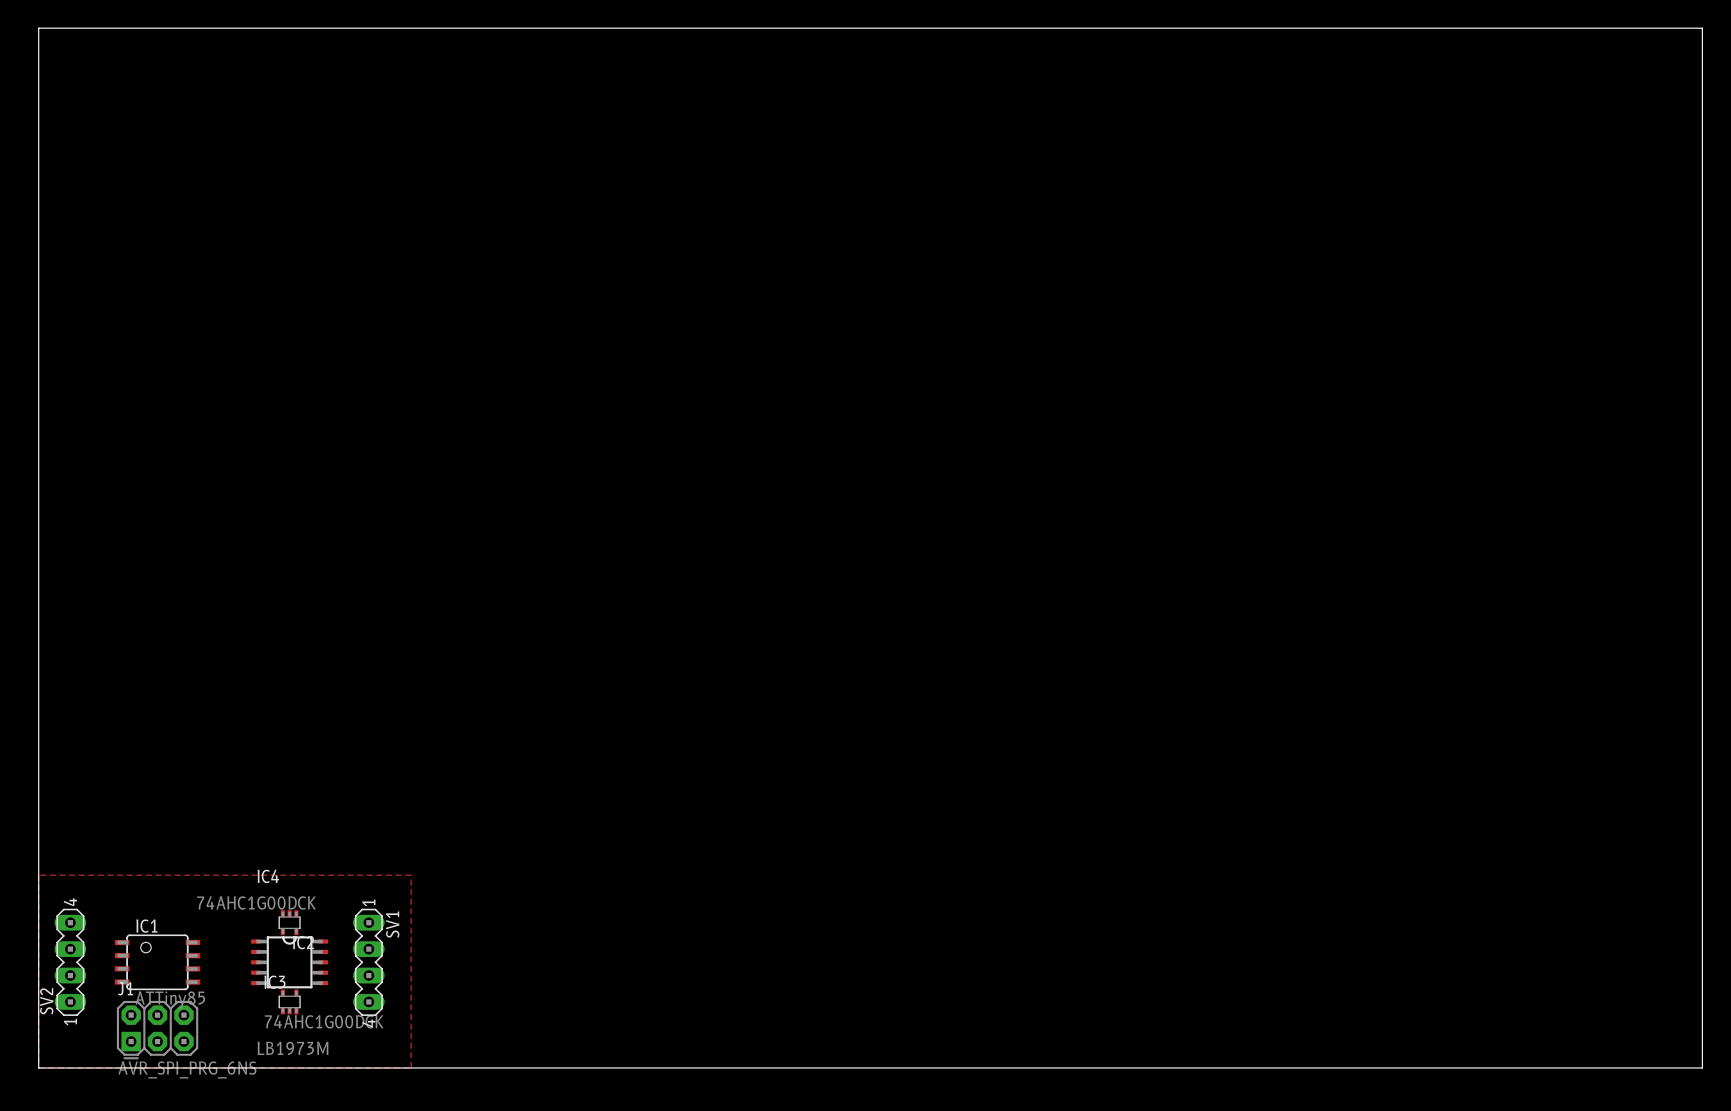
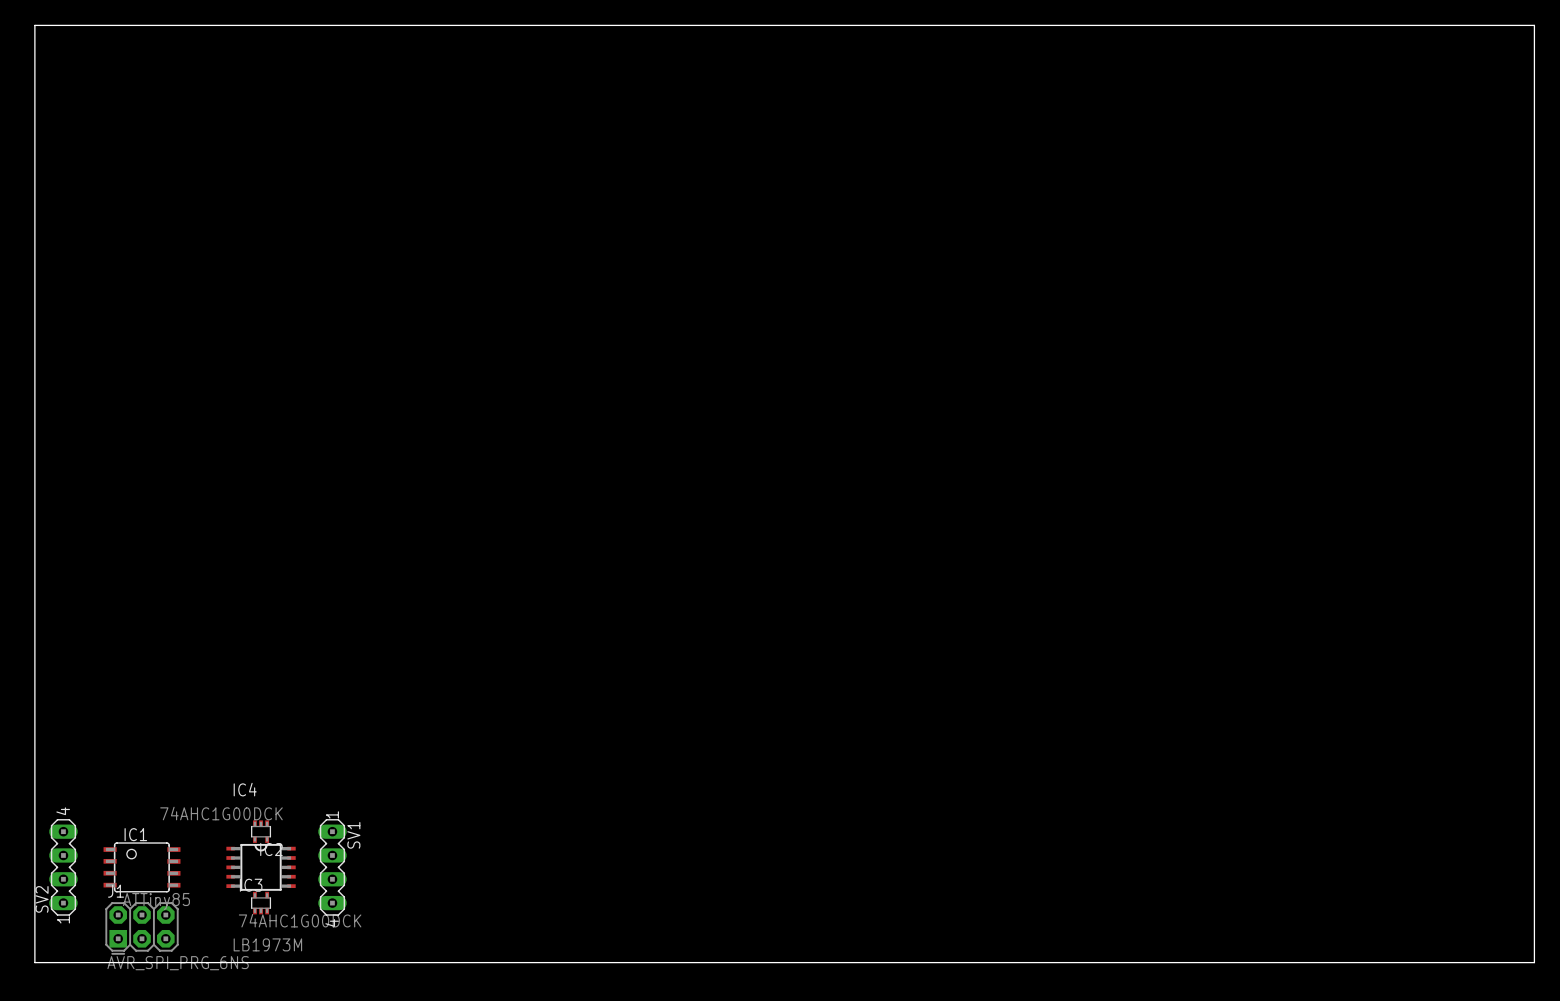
zone outline: (38, 875) (38, 1067) (411, 1067) (411, 875) (38, 875) -> none

